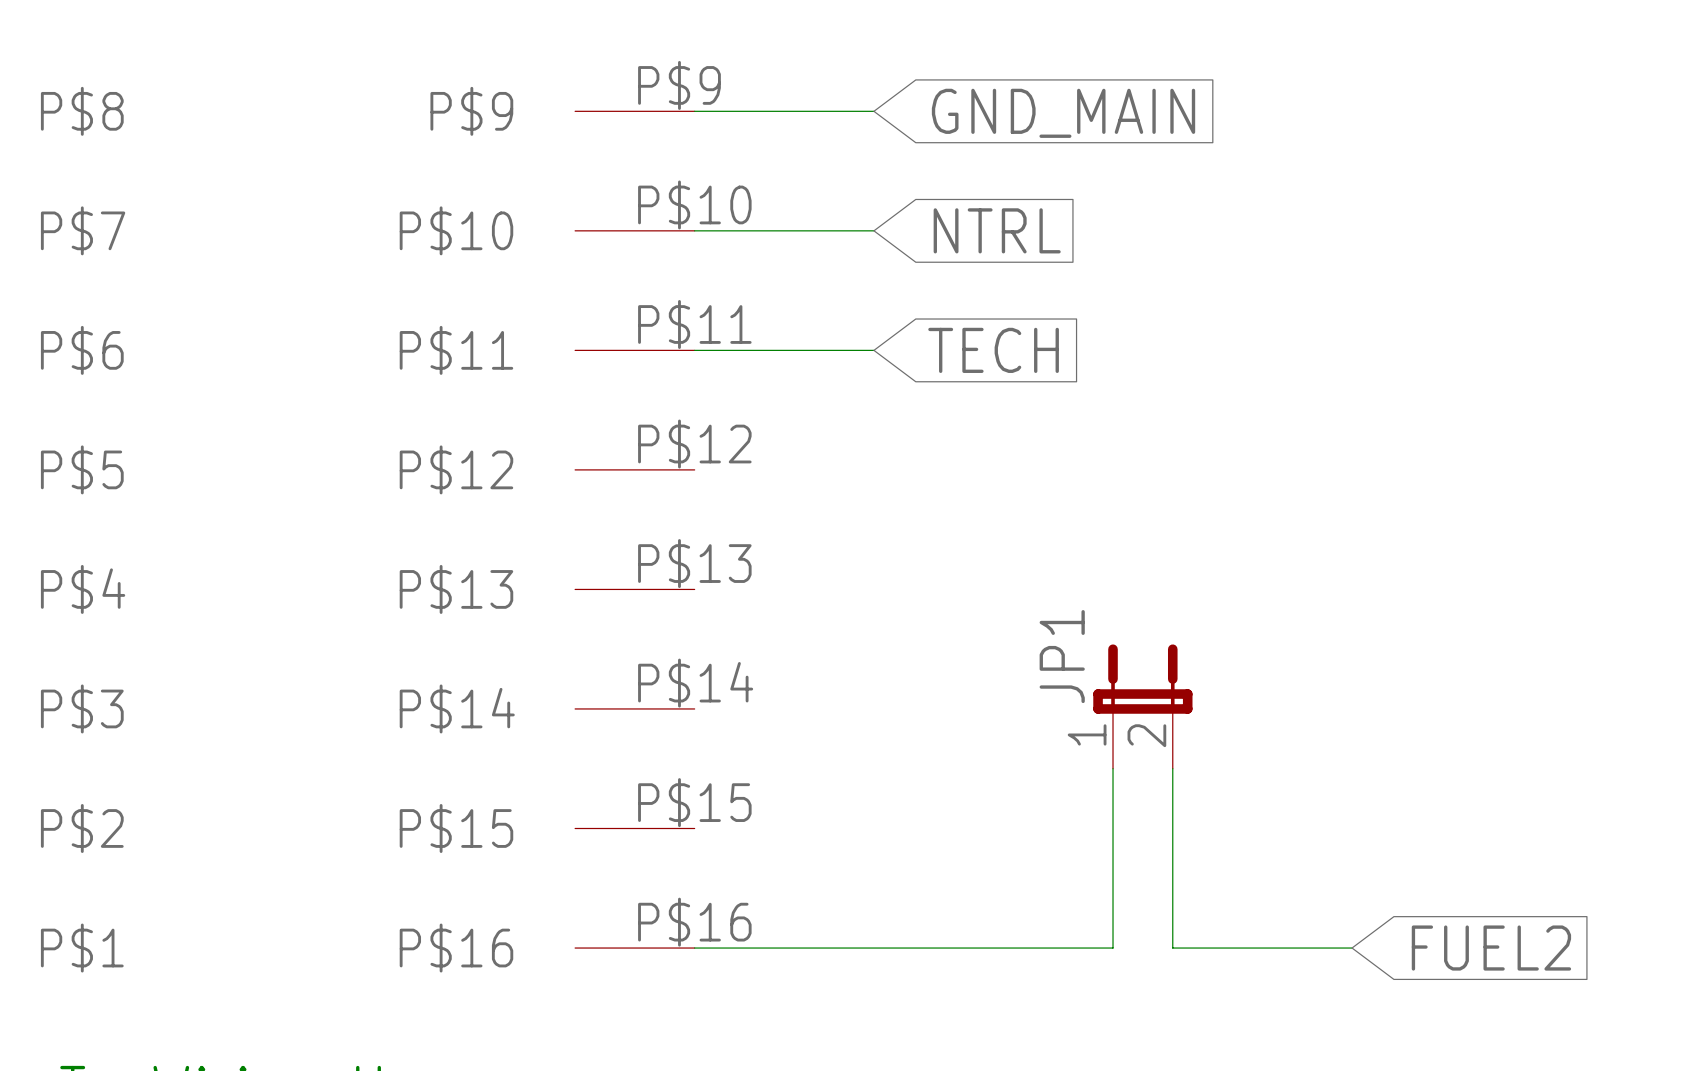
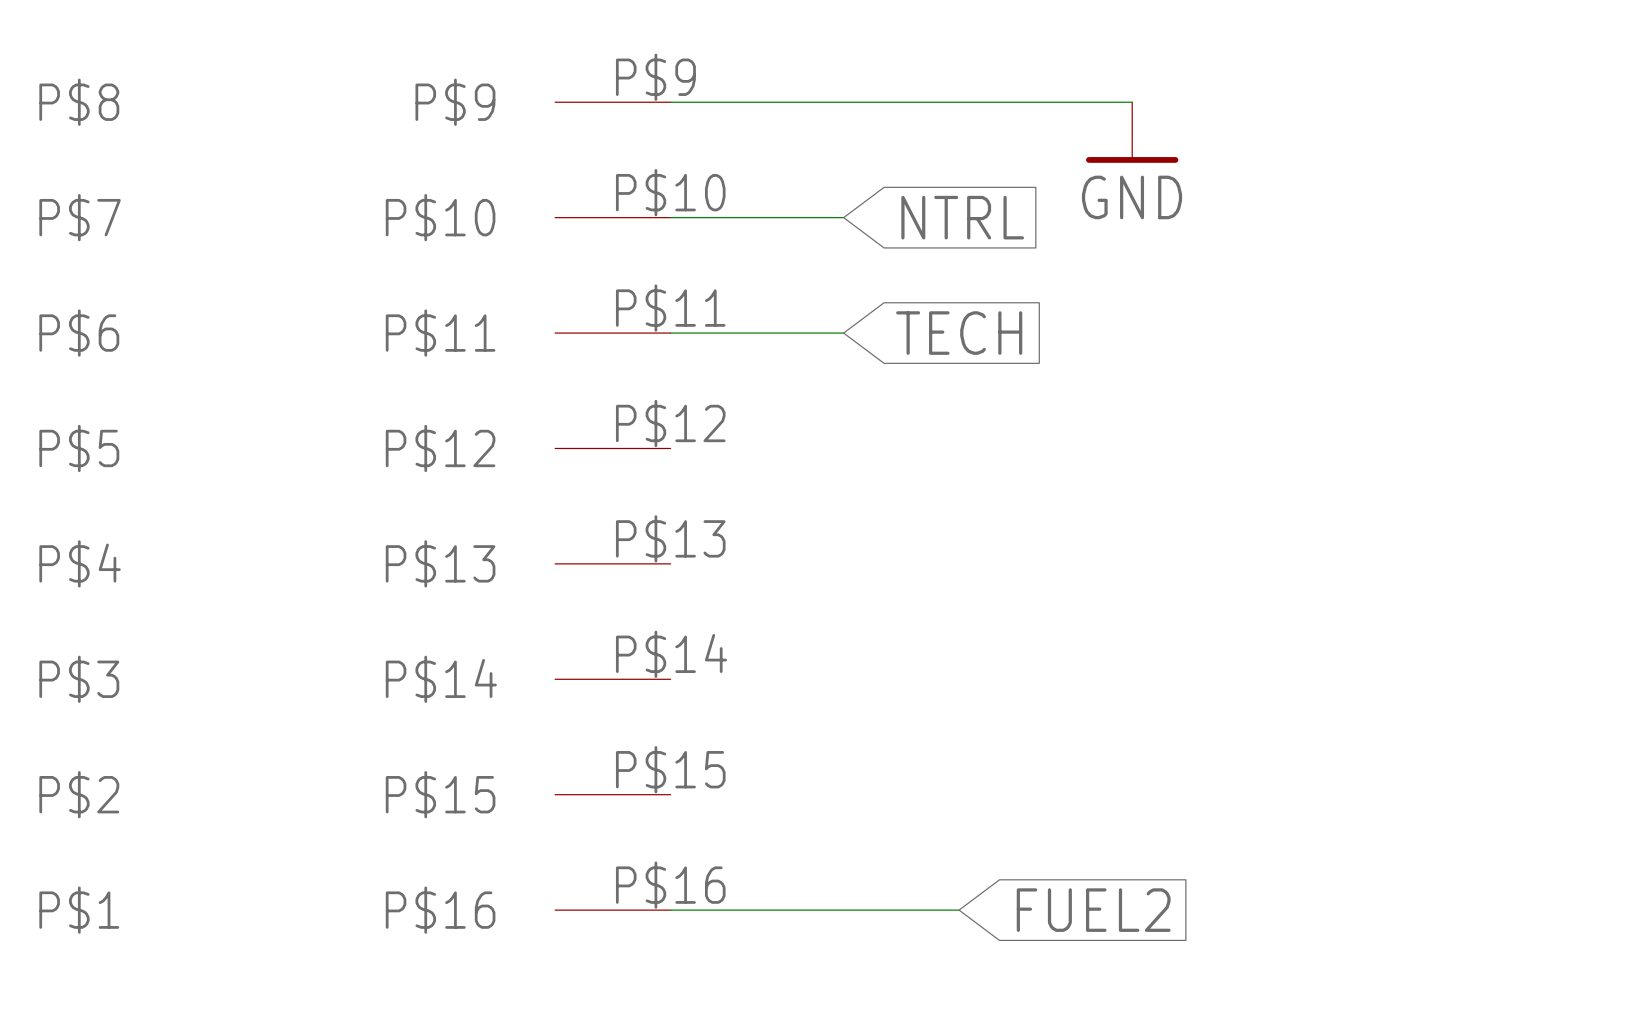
wire: none -> (843, 102) (1132, 102)
global label: GND_MAIN (1063, 113) -> none
power symbol: none -> GND (1132, 132)
JP1: (1142, 706) -> none
wire: (1113, 768) (1113, 948) (993, 948) -> none
wire: (1172, 768) (1172, 948) (1352, 948) -> none
global label position: FUEL2 (1491, 948) -> FUEL2 (1093, 910)

